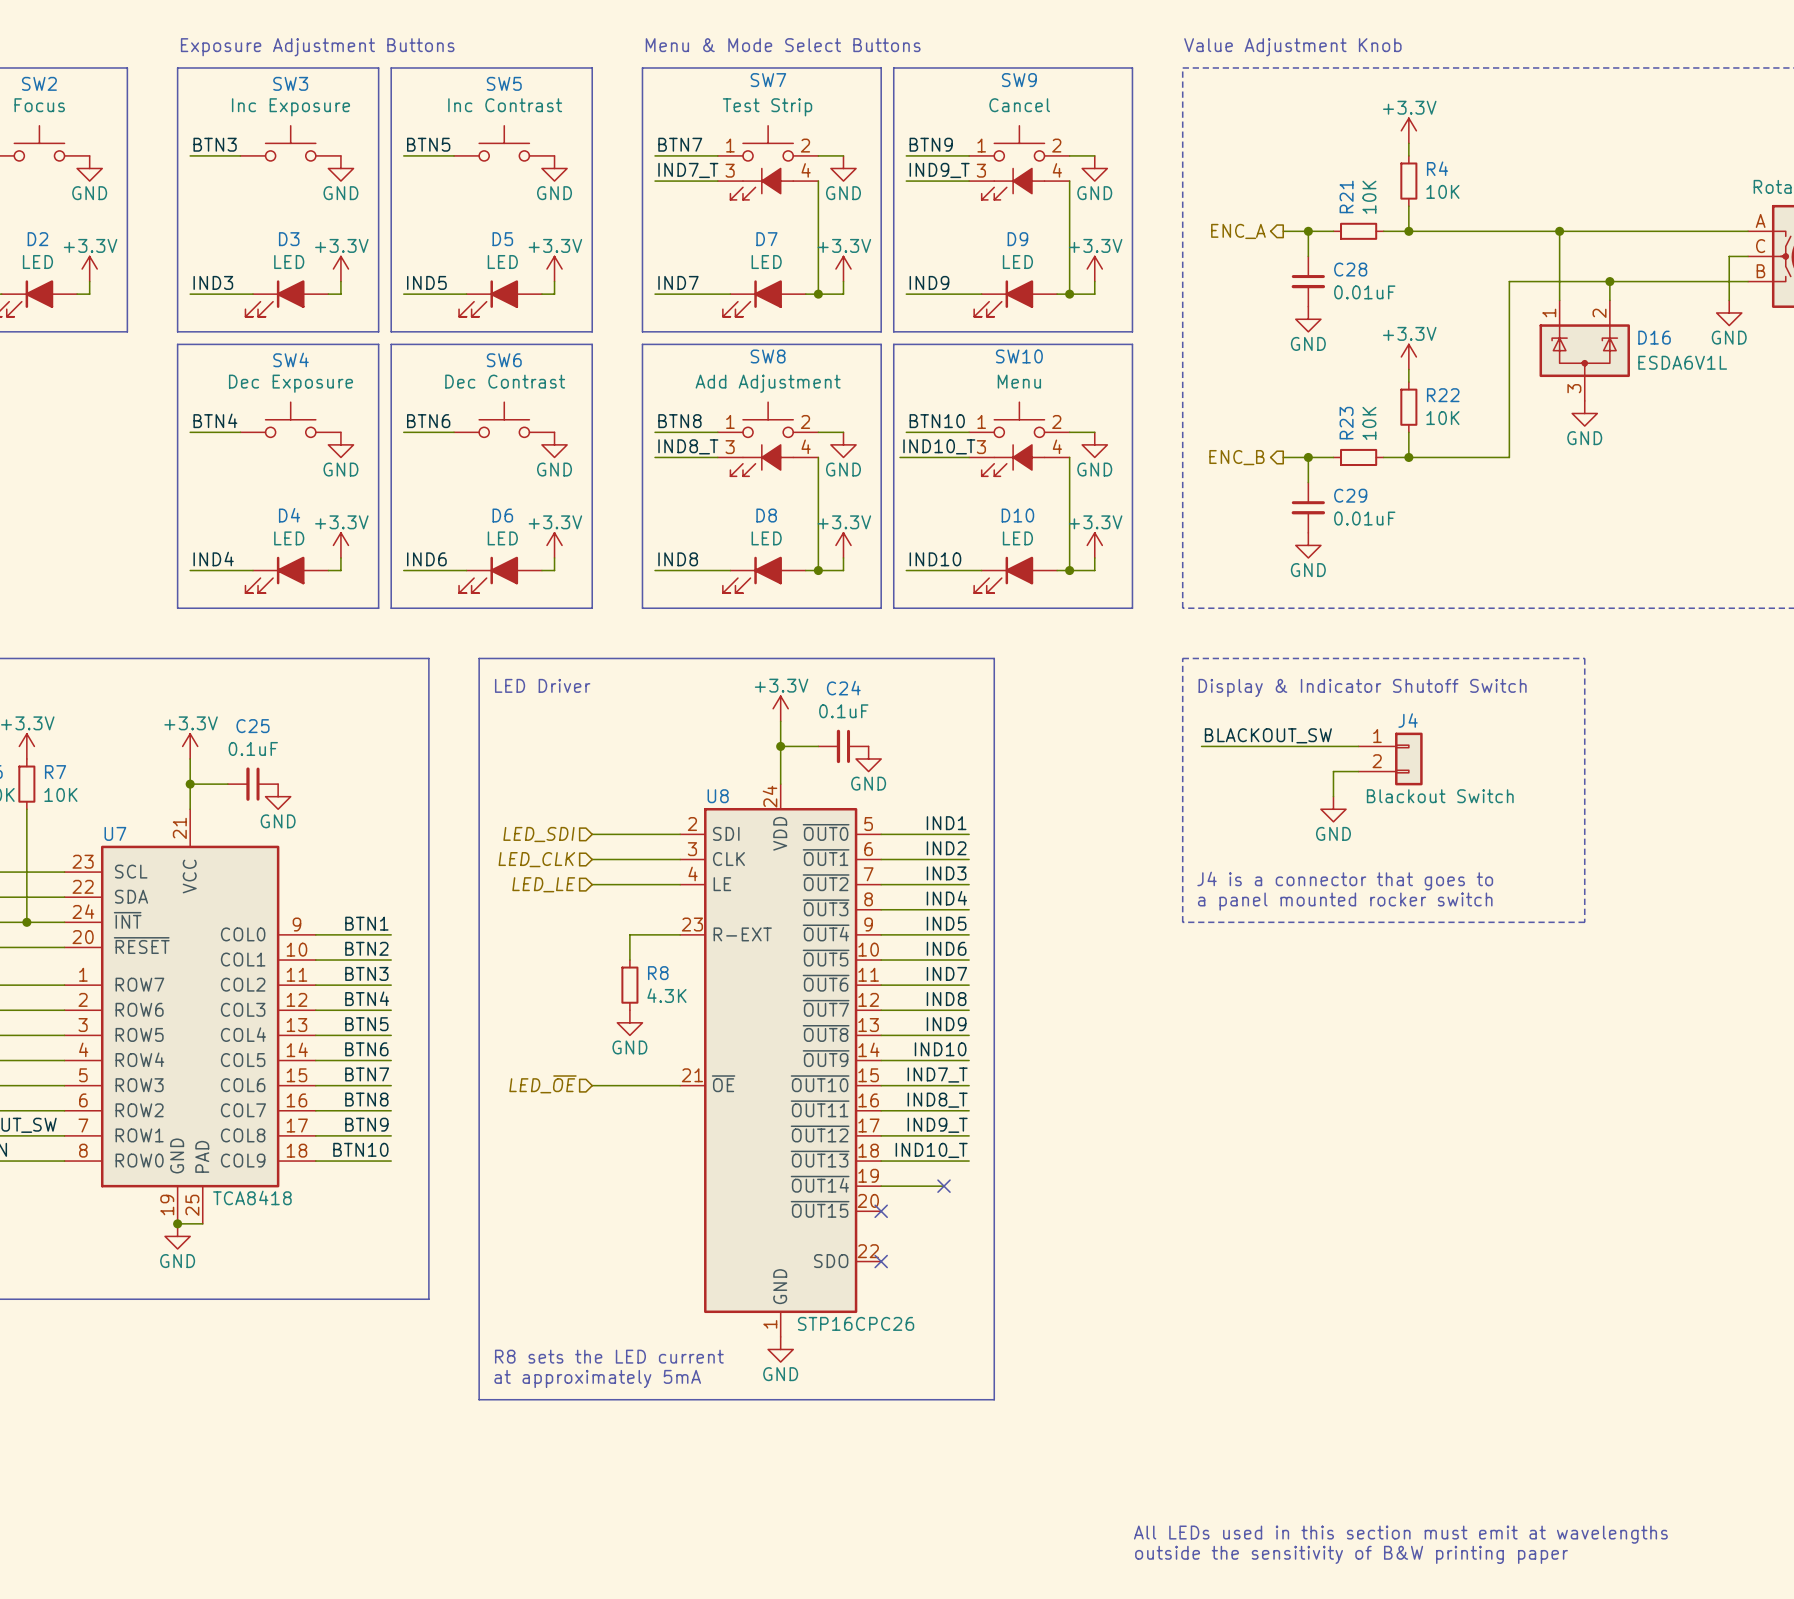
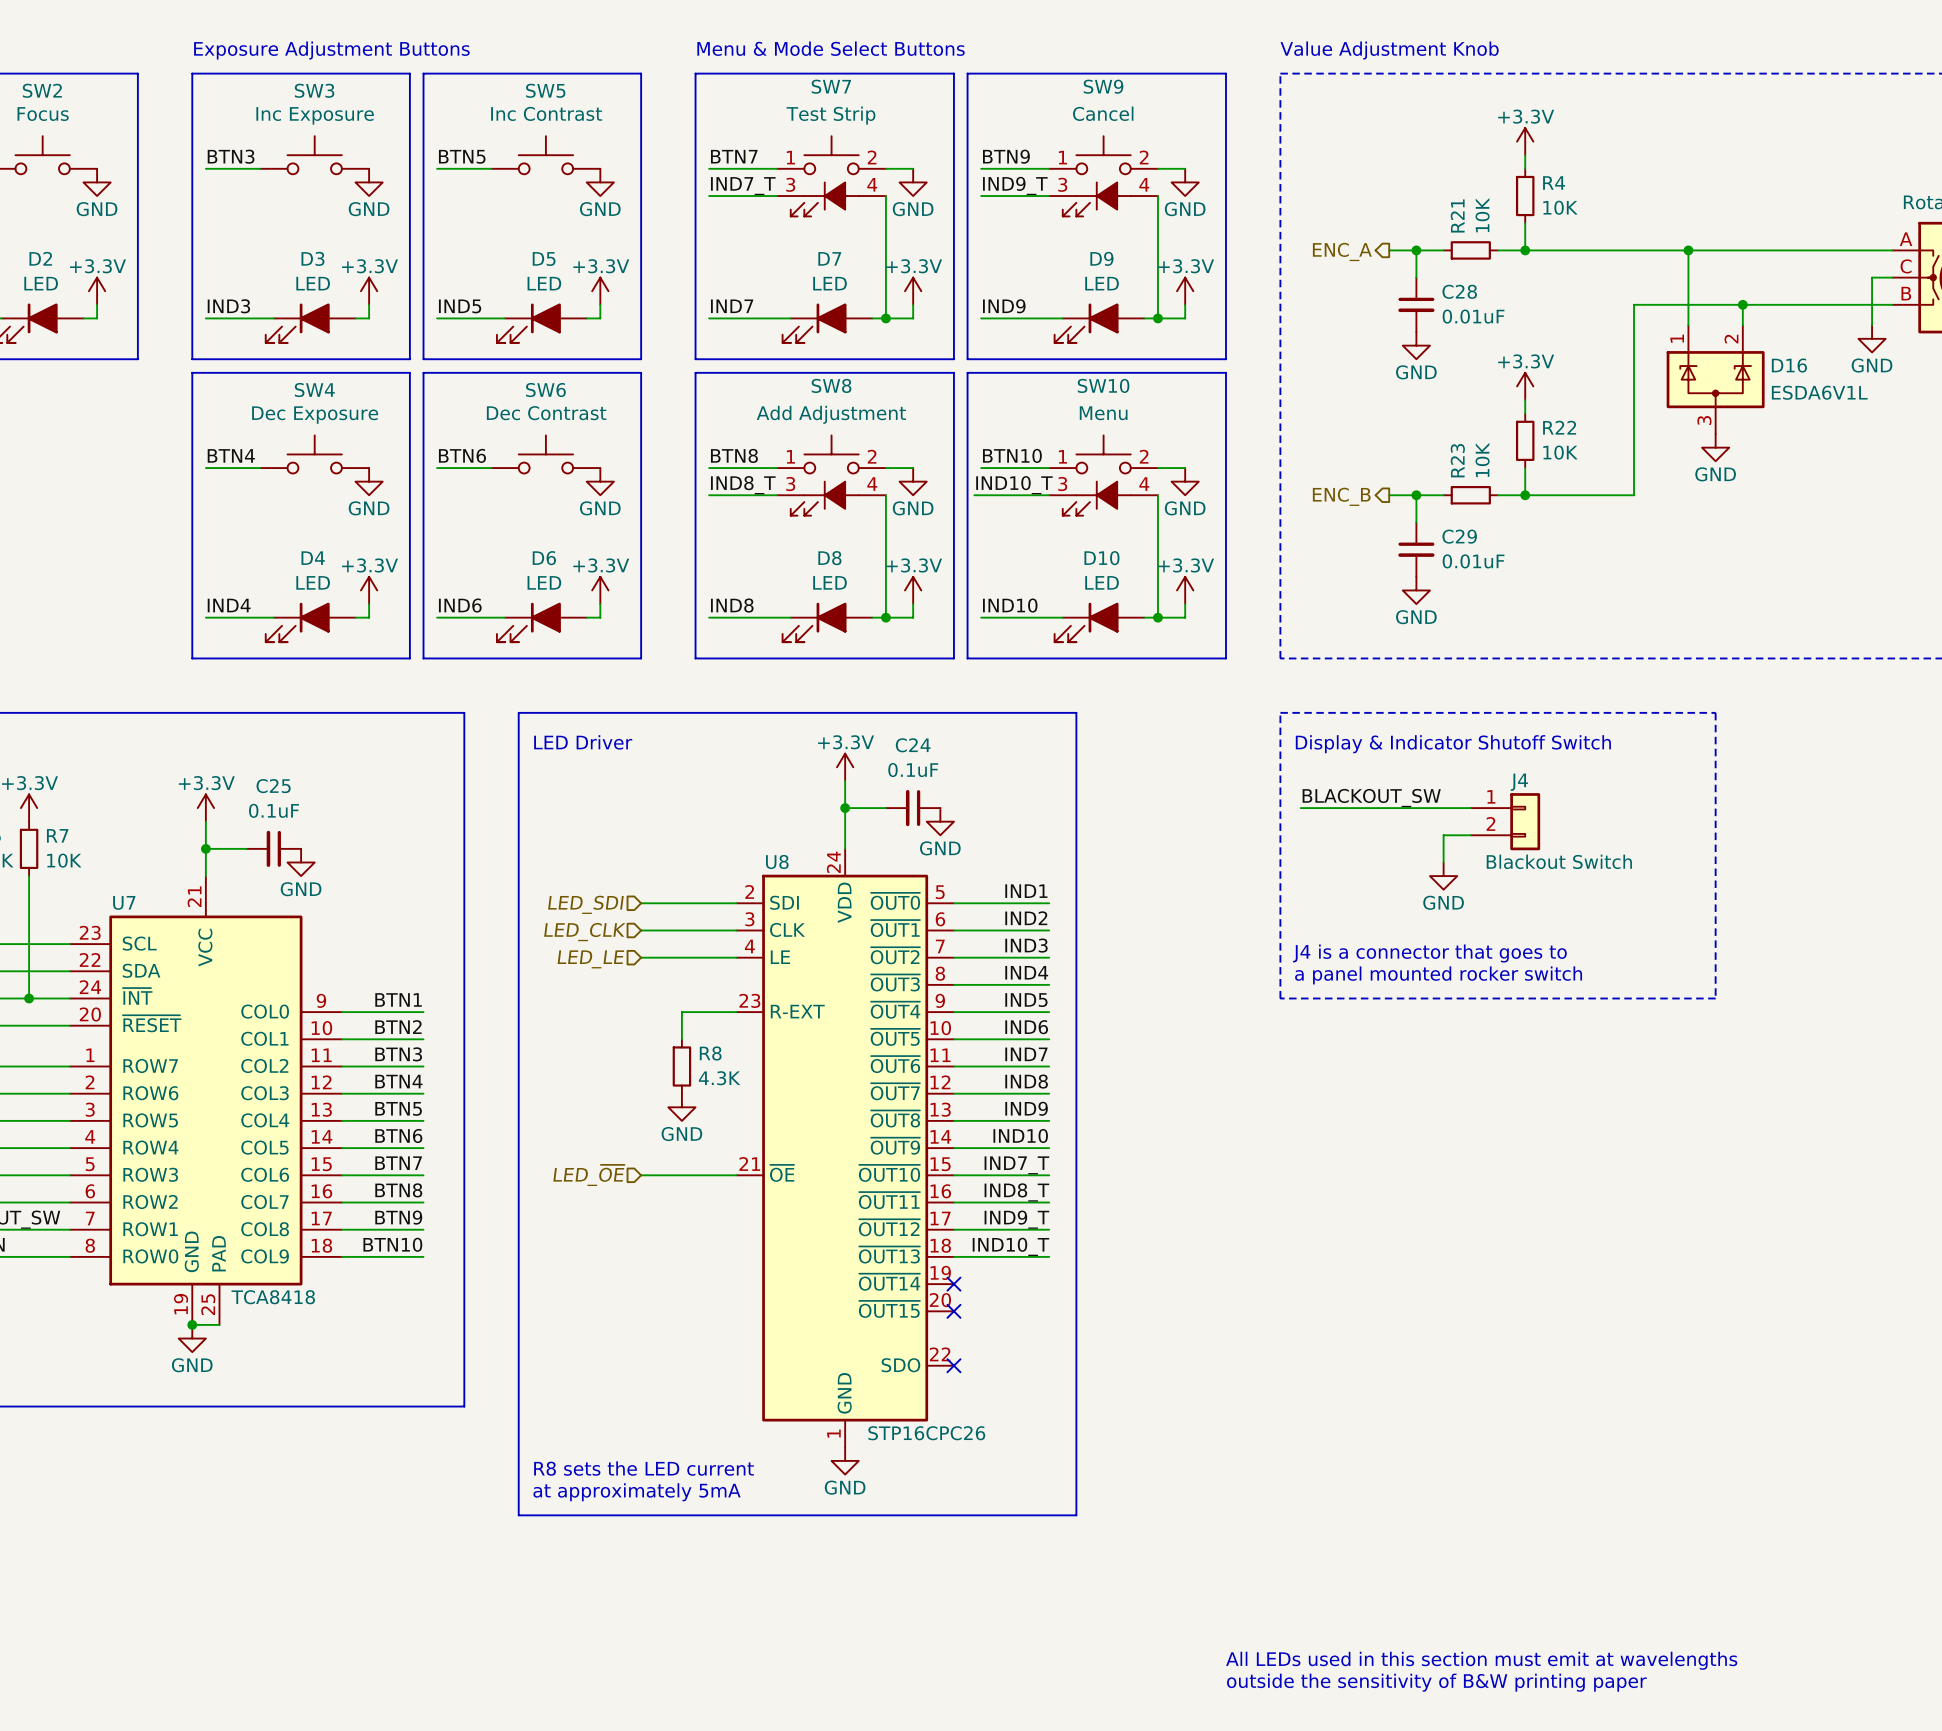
wire: (881, 1186) (944, 1186) -> none
no-connect mark: none -> (953, 1284)
no-connect mark: (944, 1186) -> none

